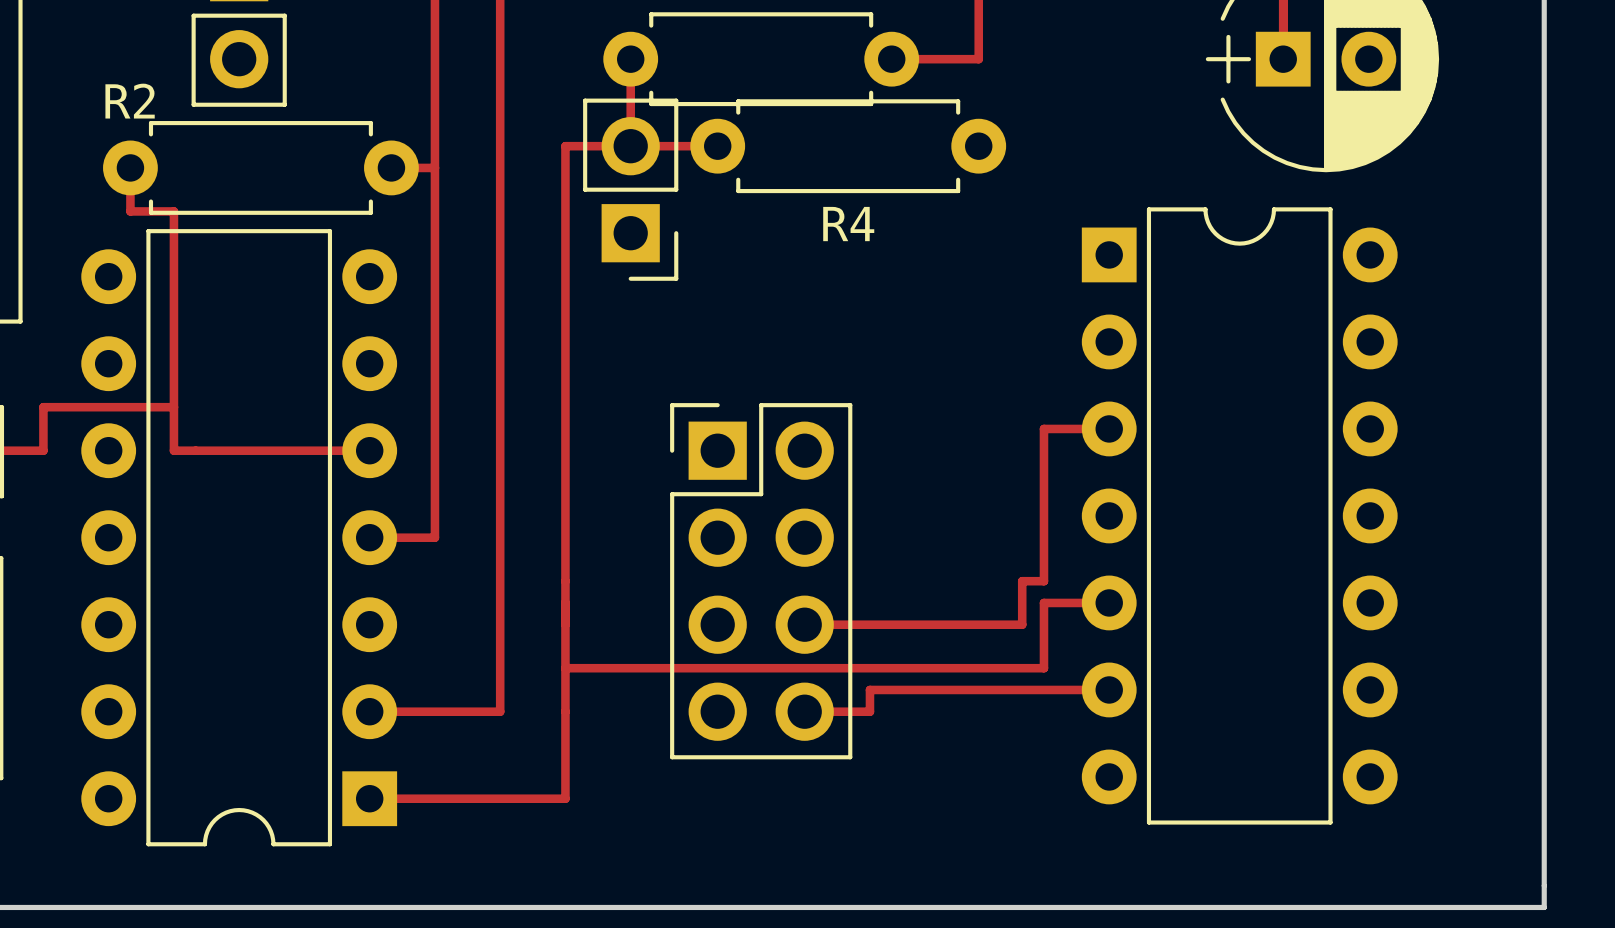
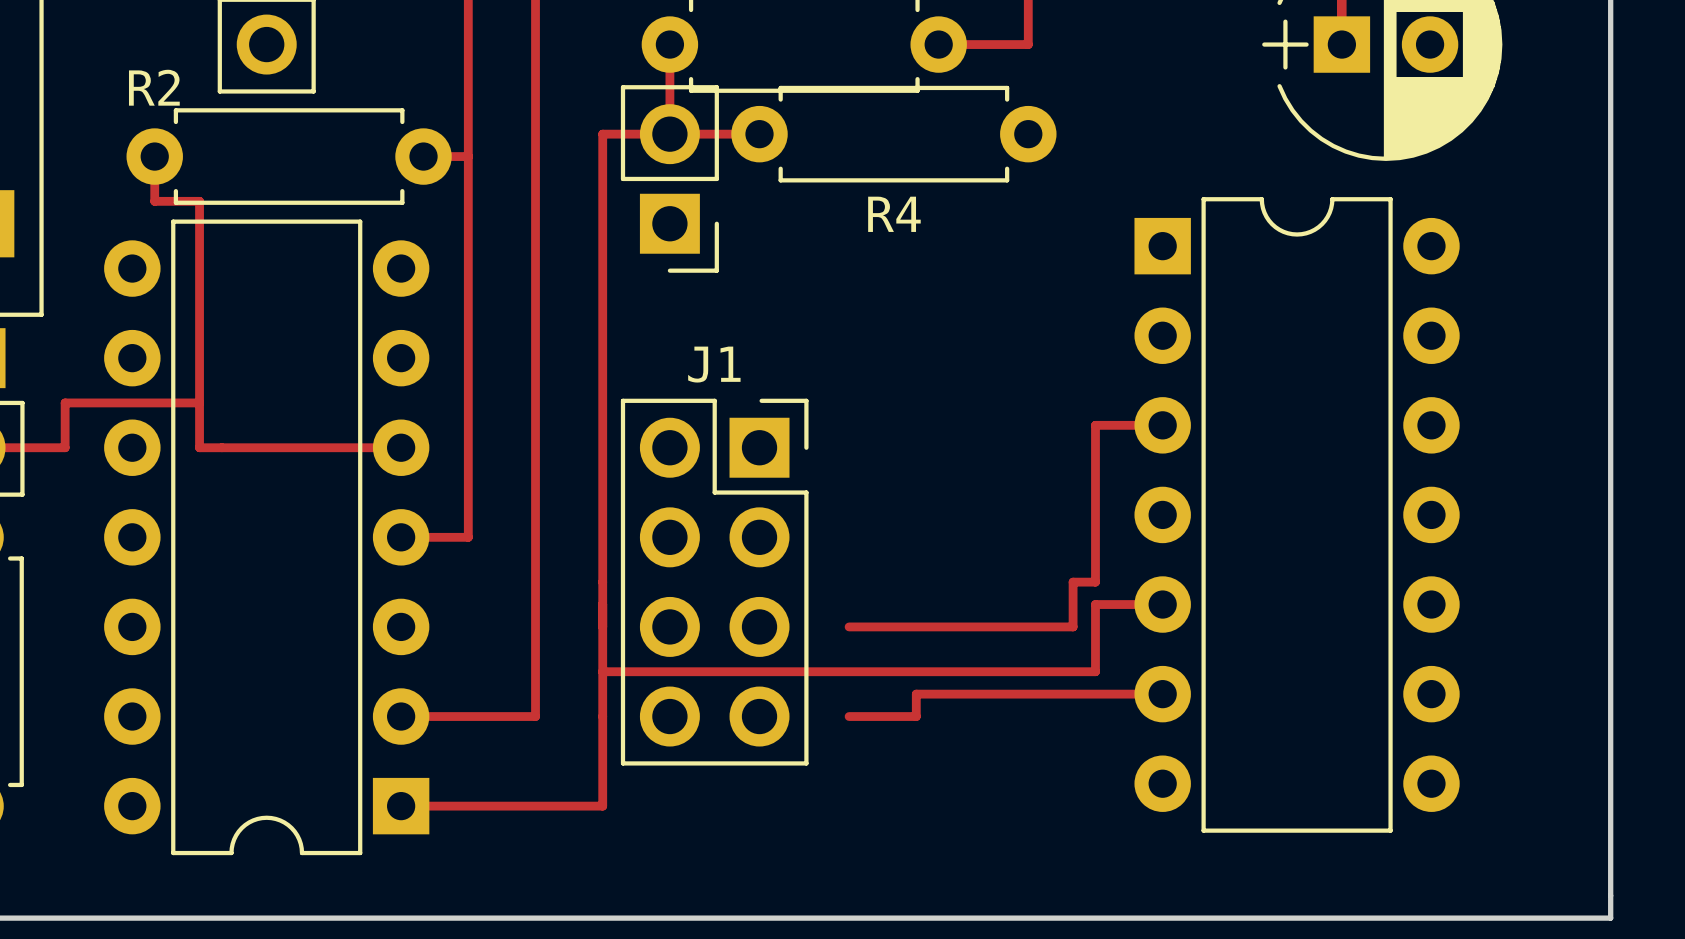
J1: none -> (714, 582)
part: (761, 581) -> none

